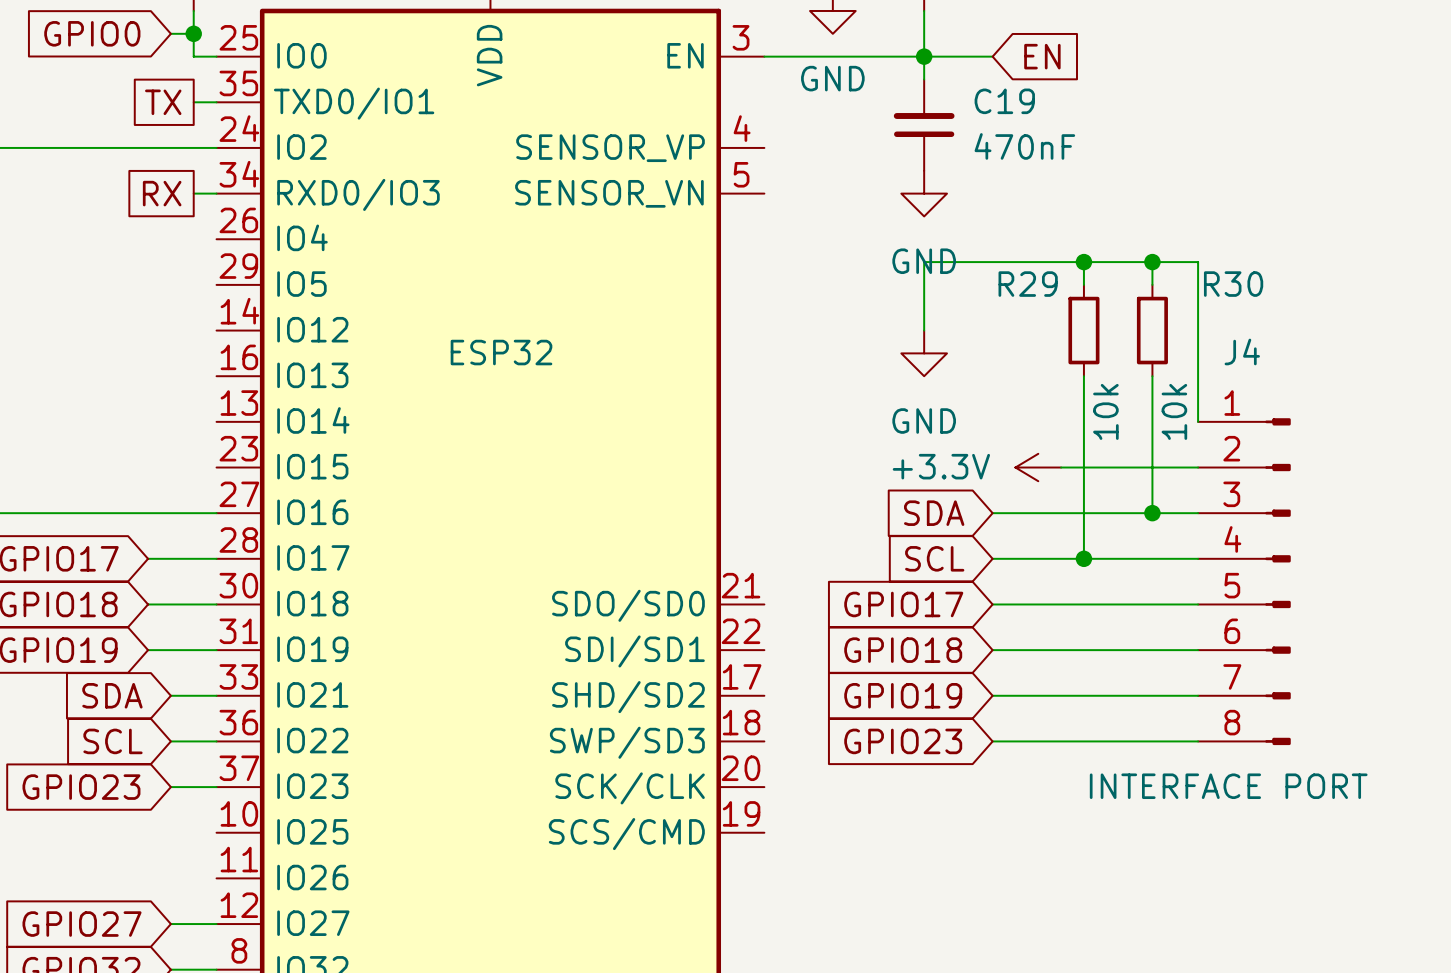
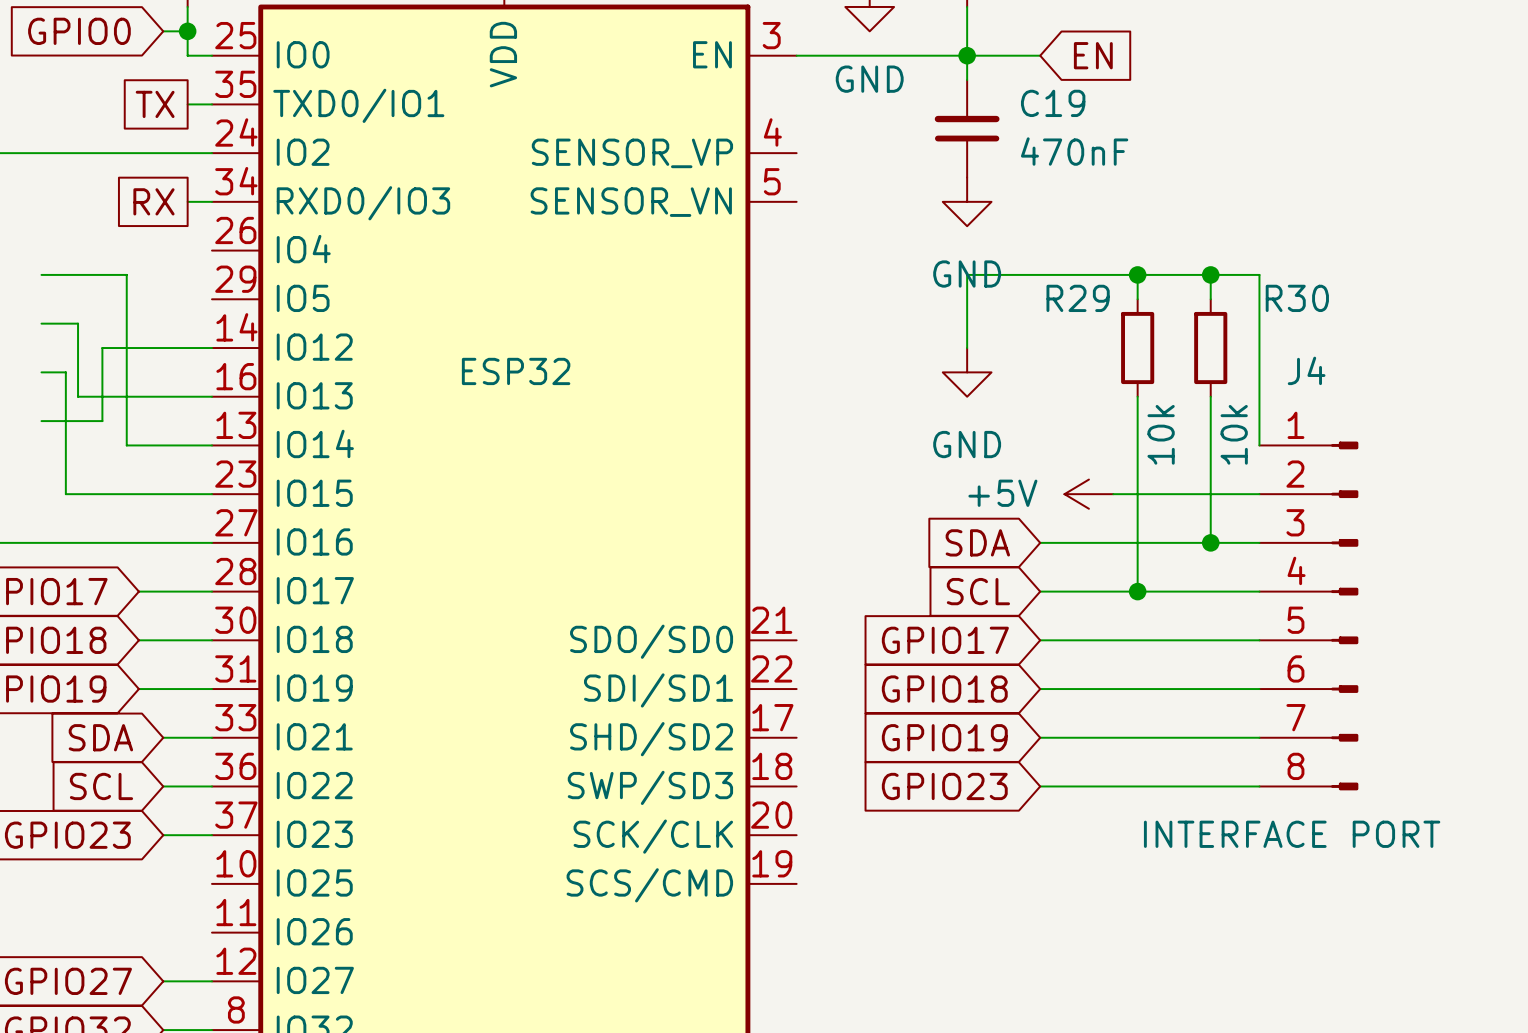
wire: none -> (41, 274) (126, 274) (126, 445) (212, 445)
wire: none -> (41, 323) (78, 323) (78, 396) (212, 396)
wire: none -> (212, 348) (102, 348) (102, 421) (41, 421)
wire: none -> (41, 372) (65, 372) (65, 494) (212, 494)
power symbol: +3.3V (1038, 467) -> +5V (1088, 494)

